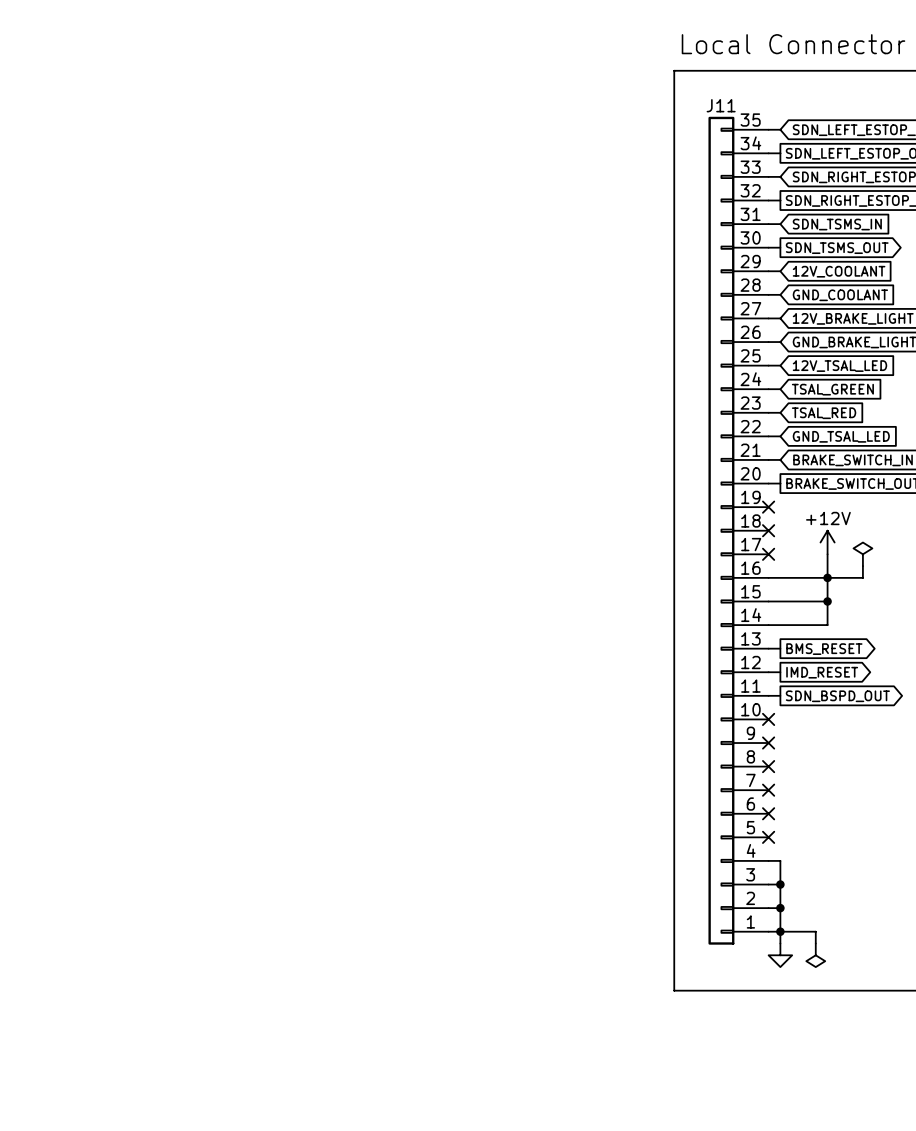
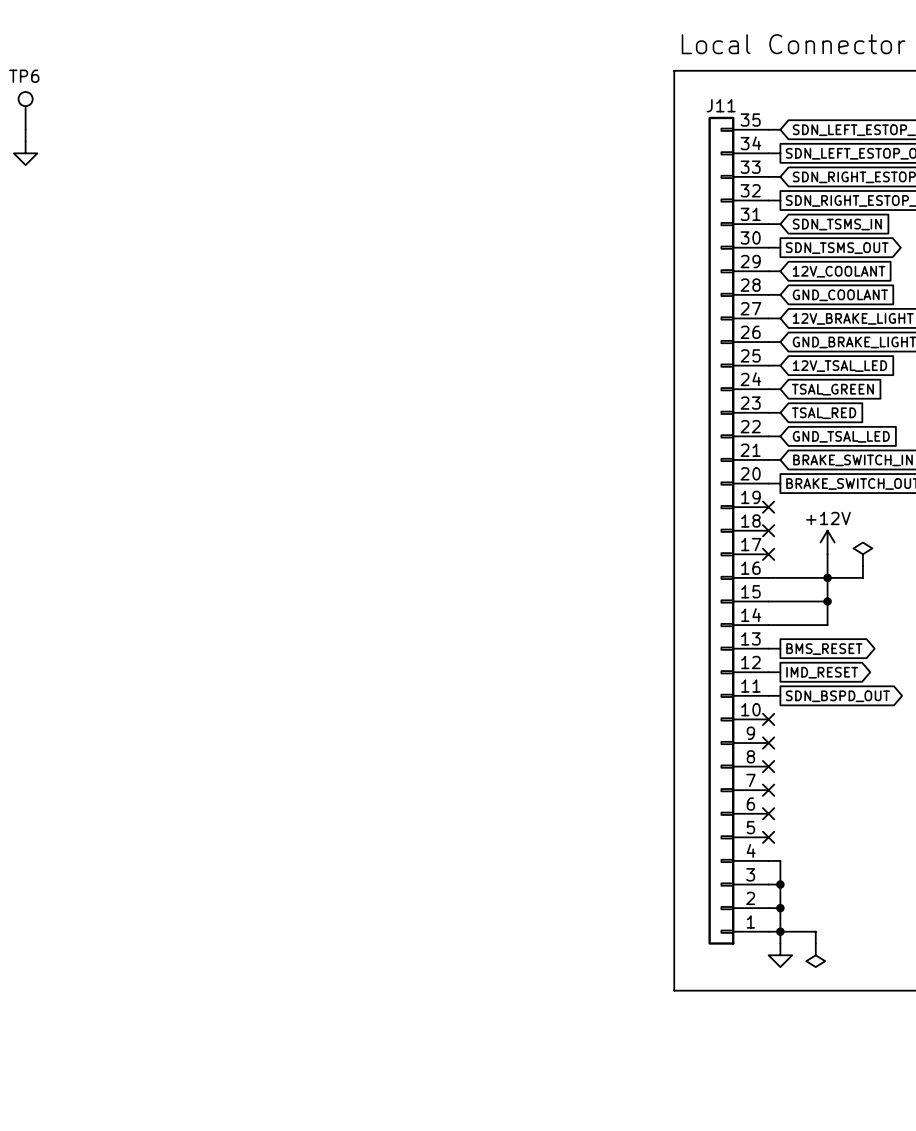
TP6: none -> (25, 110)
wire: none -> (25, 129) (25, 141)
power symbol: none -> (25, 153)

